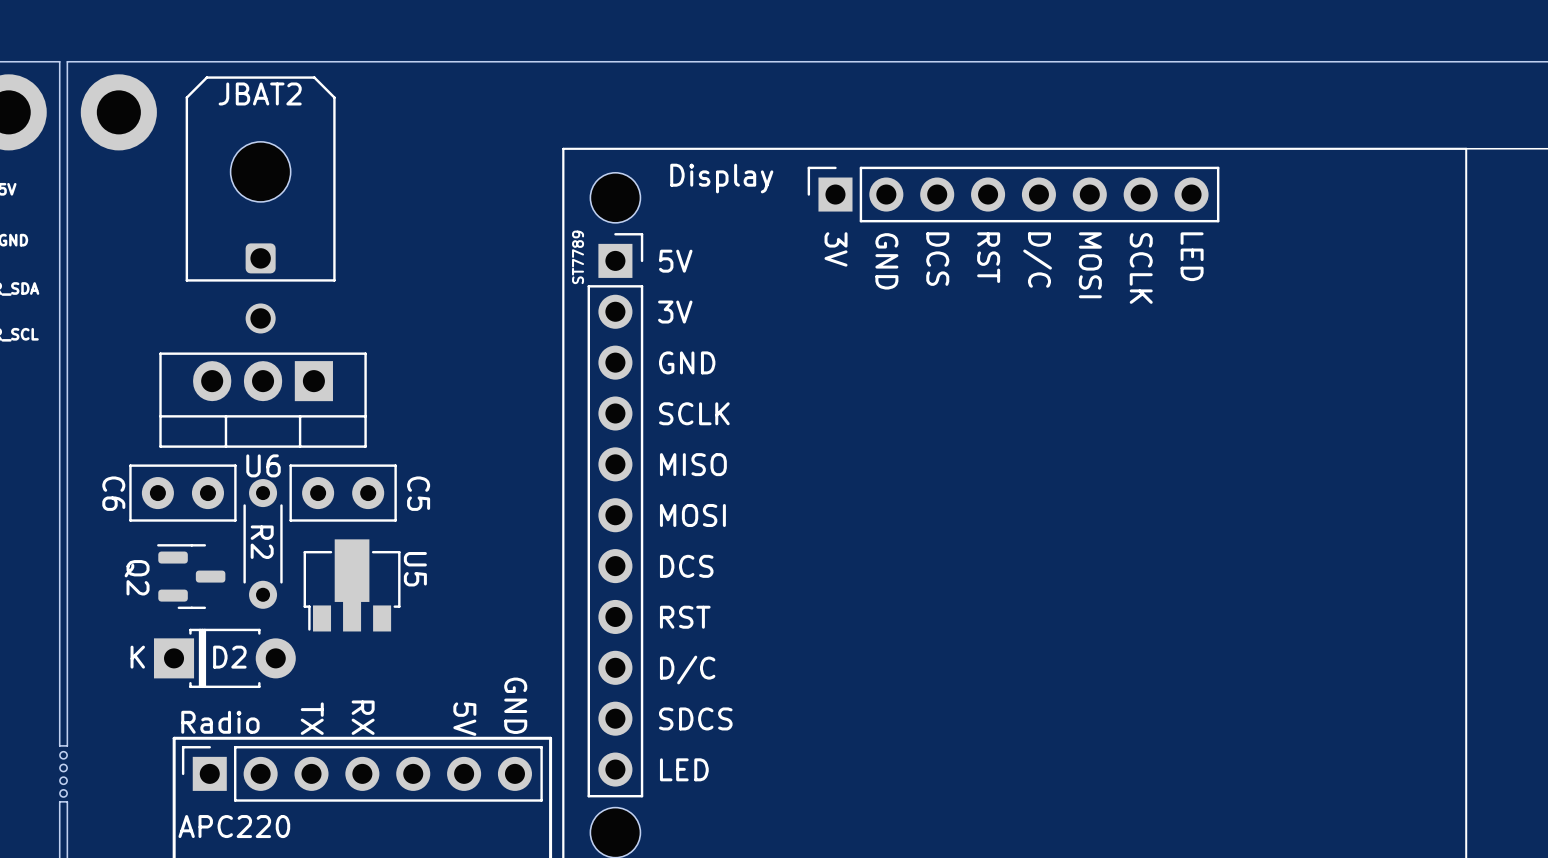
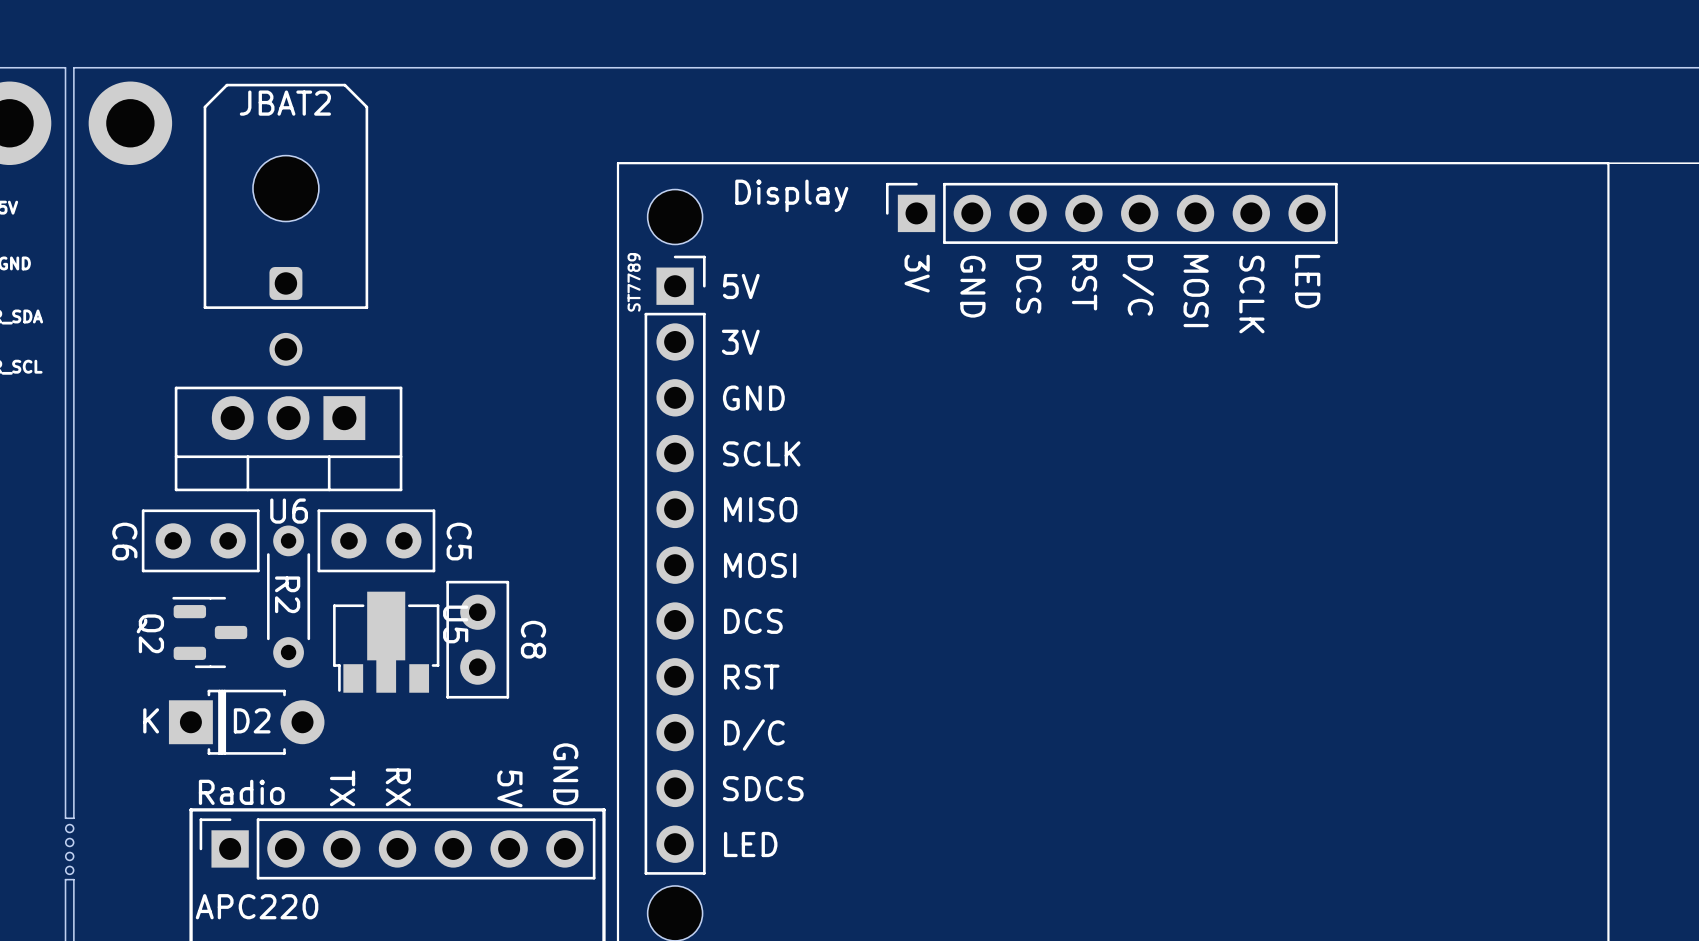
C8: none -> (477, 639)

